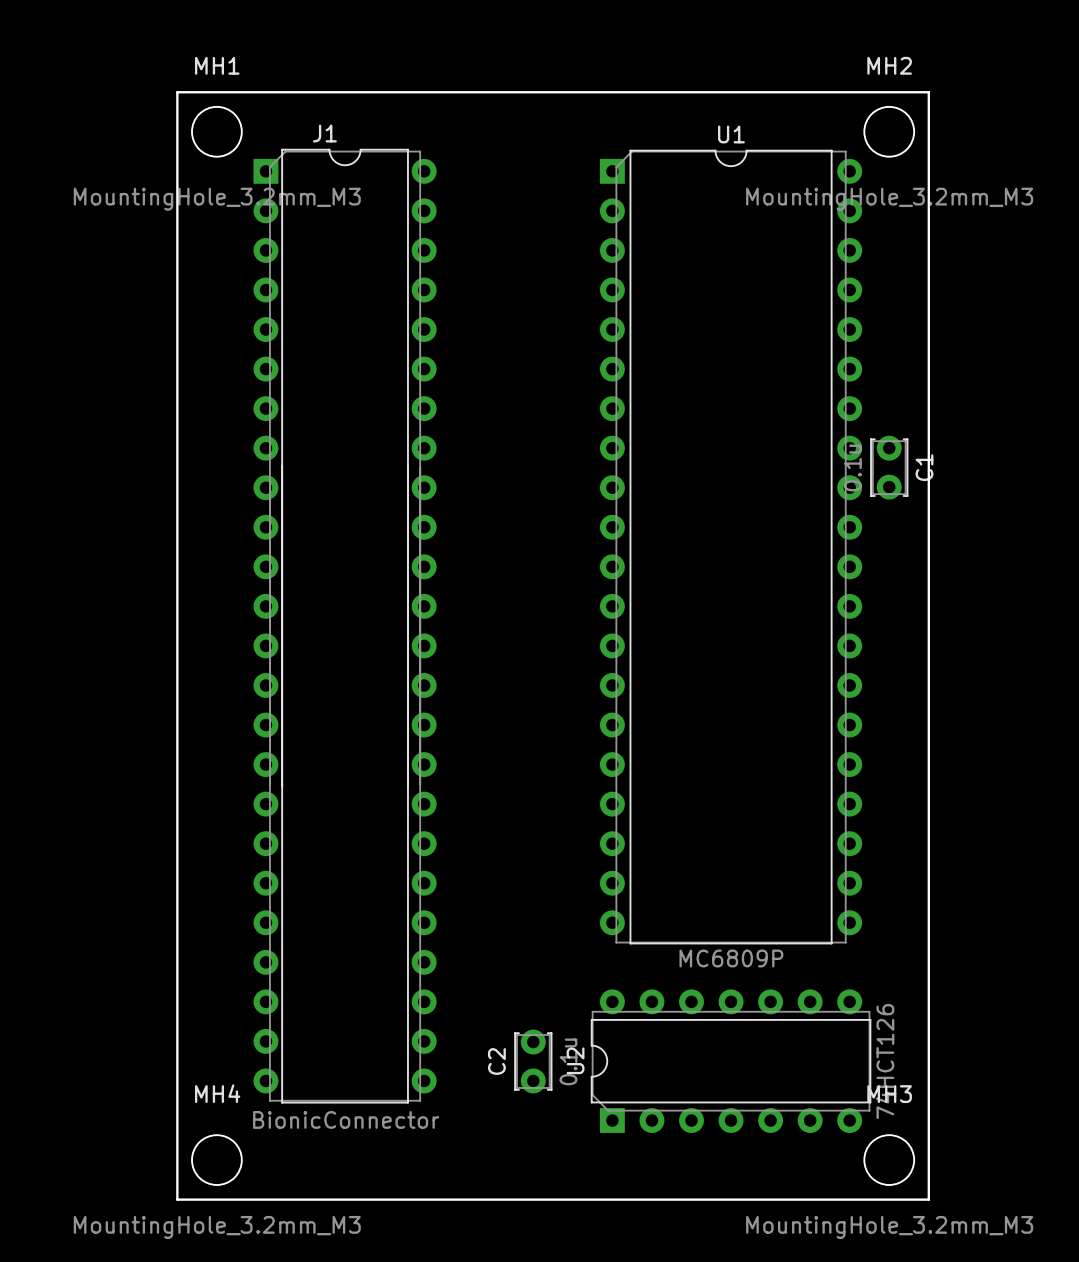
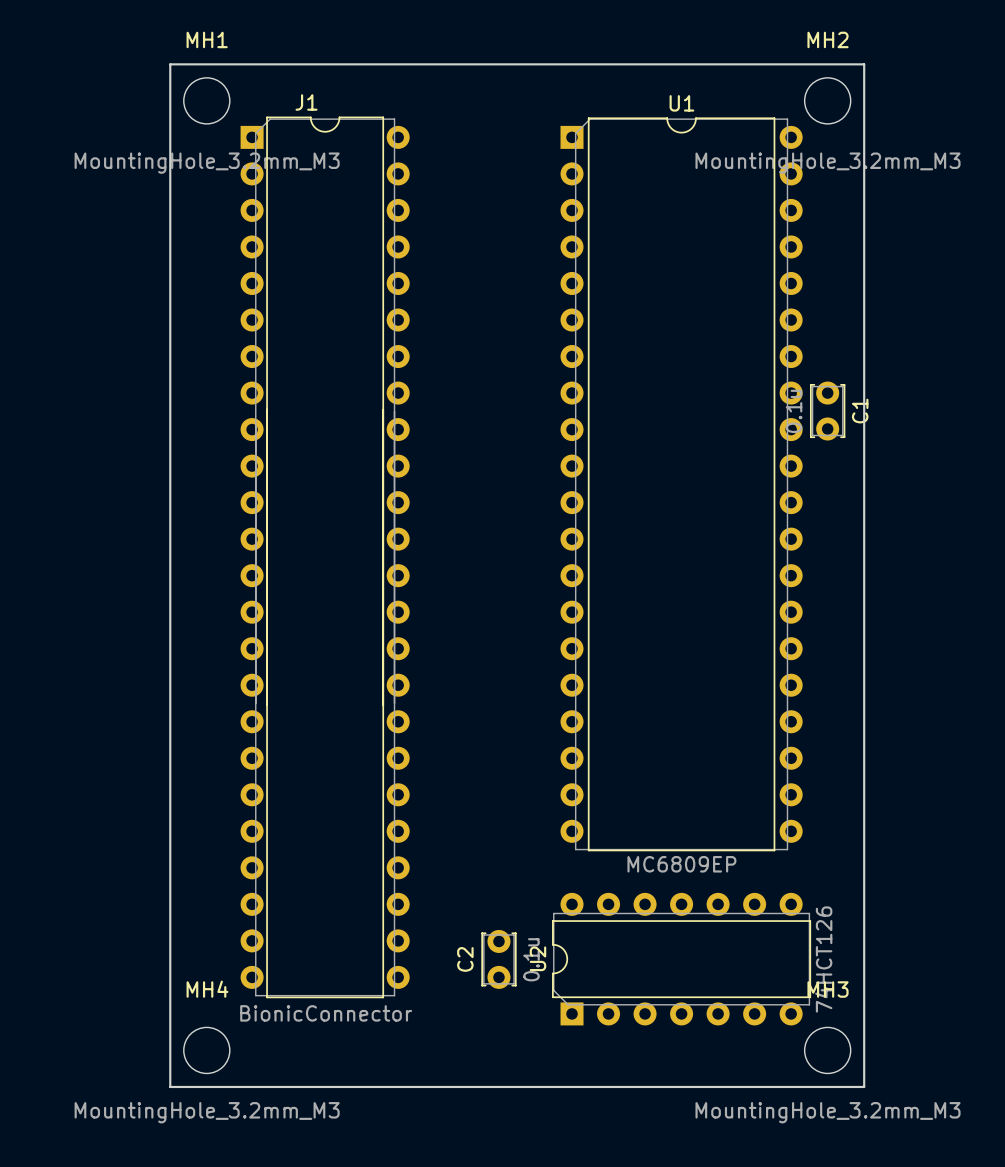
U1 value: MC6809P (731, 958) -> MC6809EP (681, 864)

